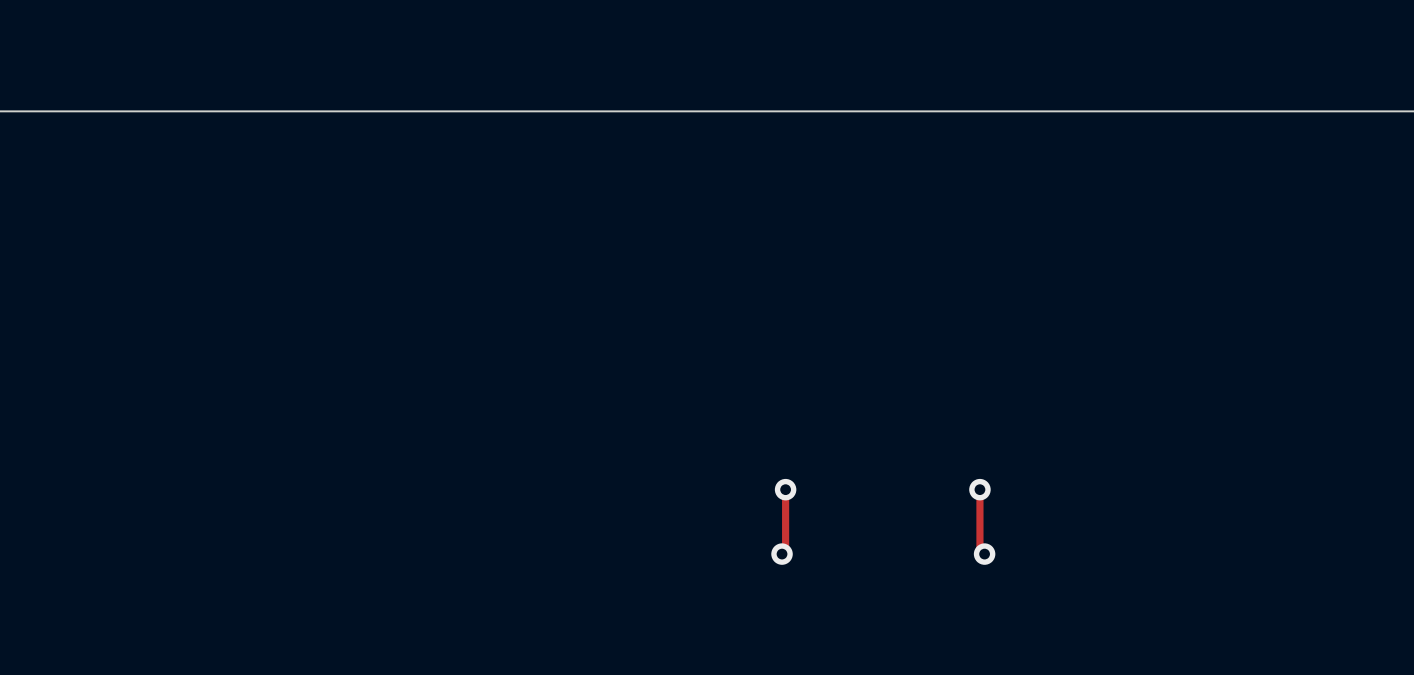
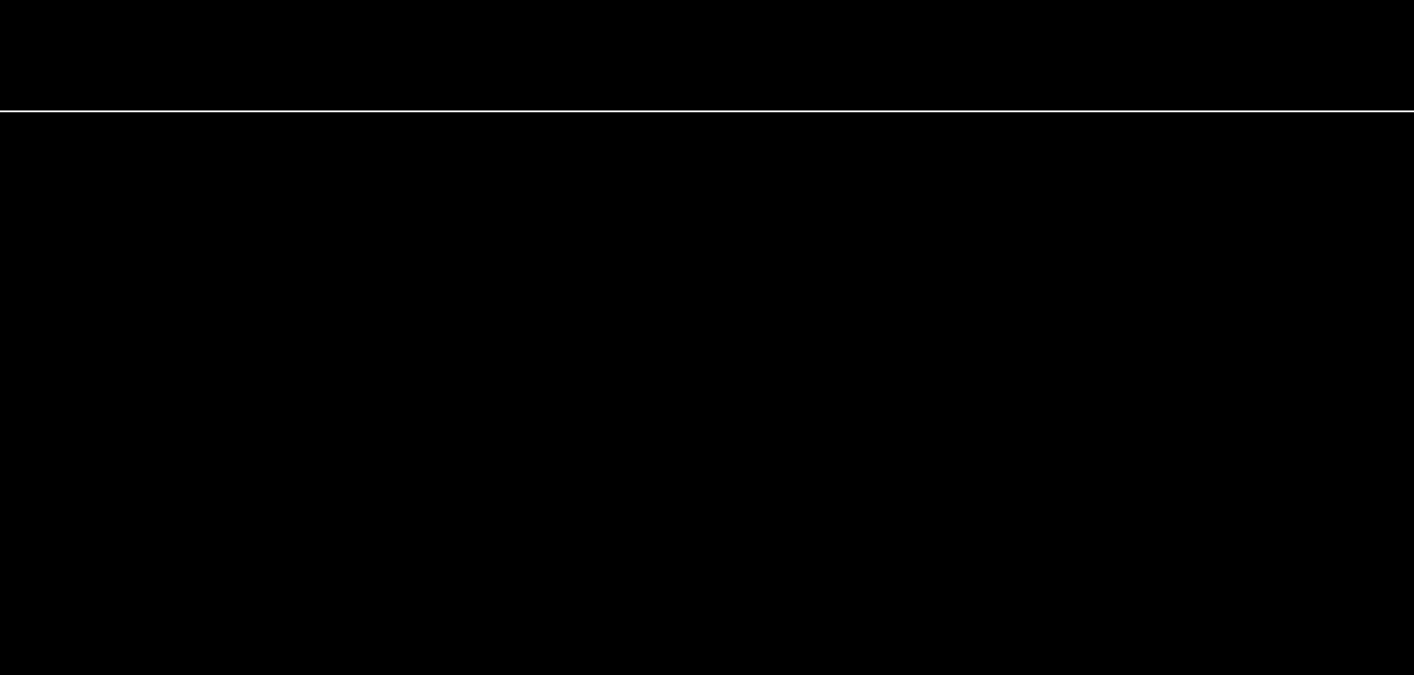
track: (785, 489) (785, 550) (782, 554) -> none
via: (785, 489) -> none
track: (979, 489) (979, 549) (984, 554) -> none
via: (979, 489) -> none
via: (782, 554) -> none
via: (984, 554) -> none

